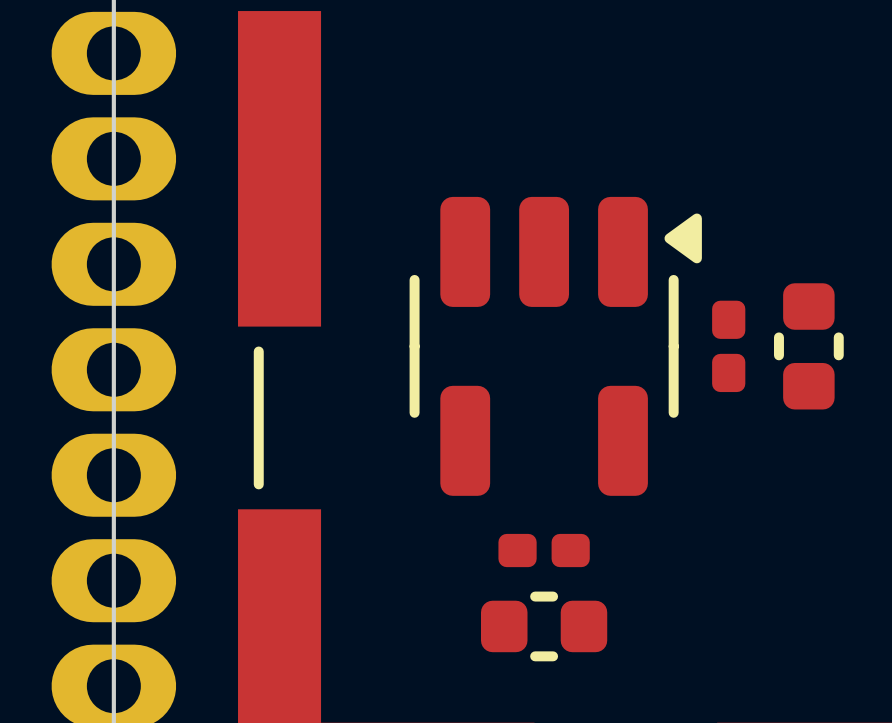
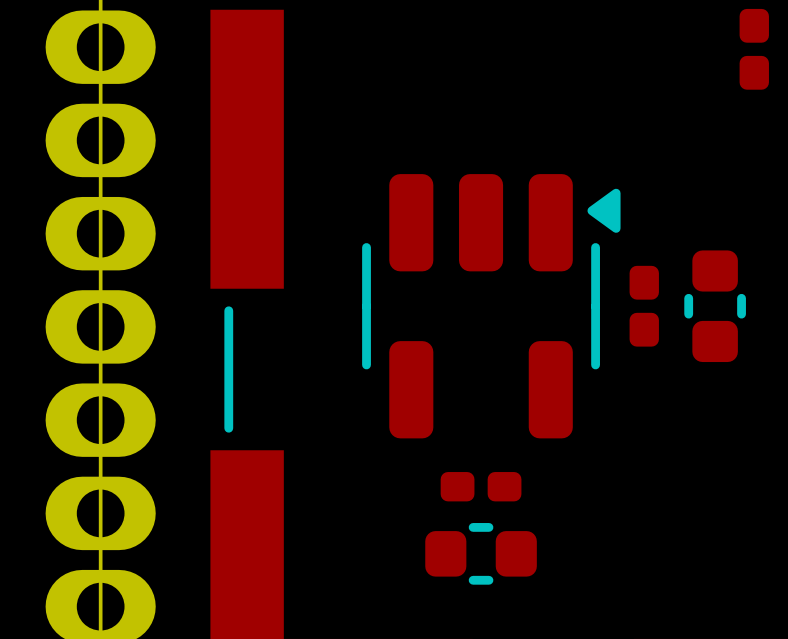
part: none -> (754, 49)

